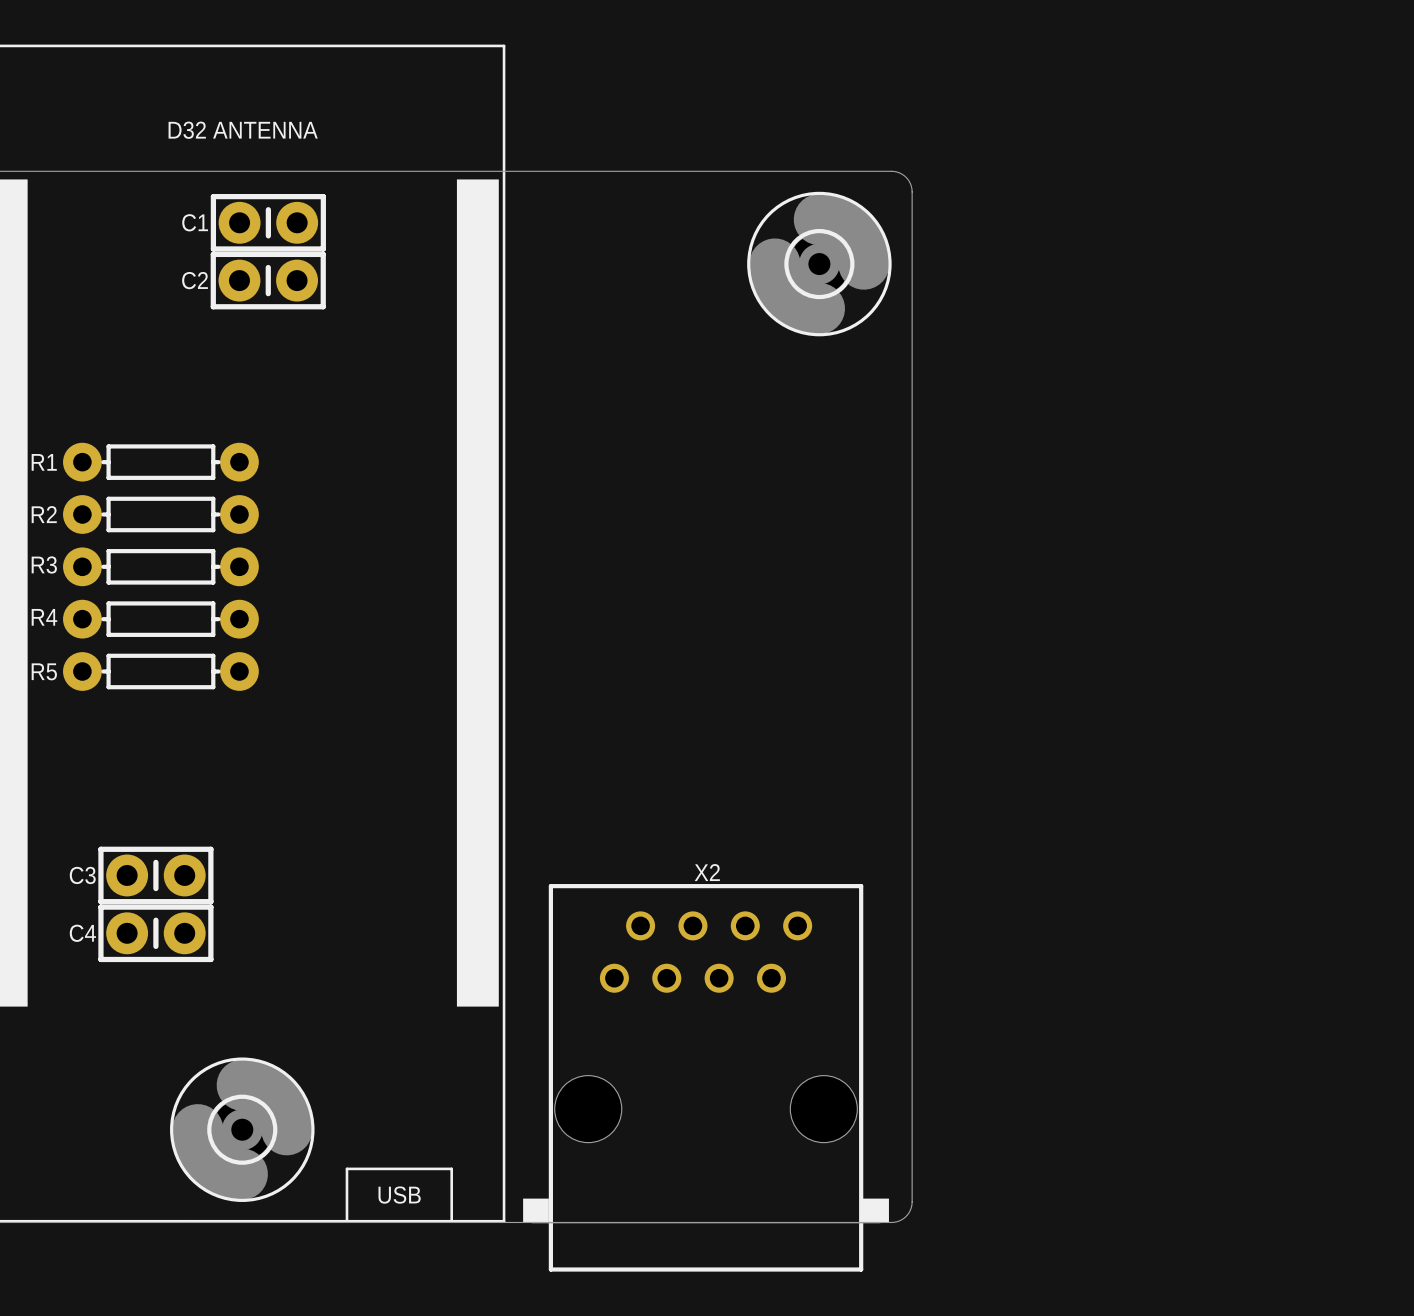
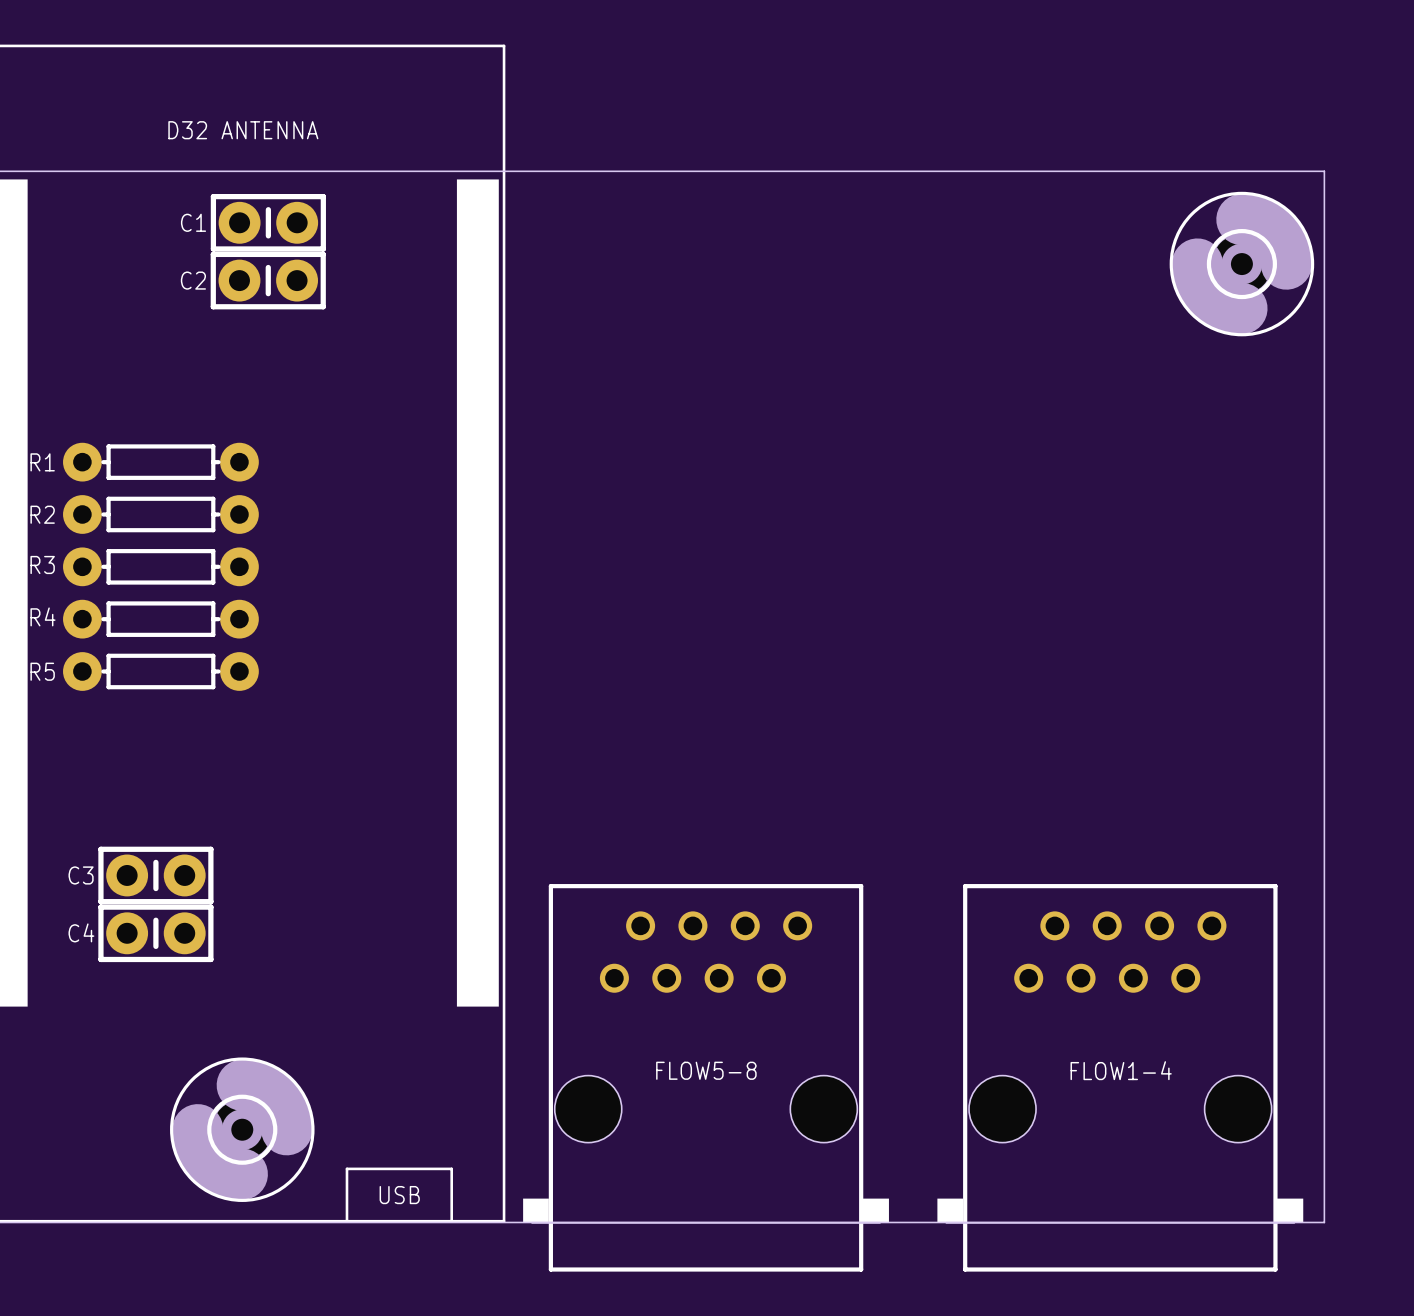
board edge: (891, 171) (899, 172) (906, 177) (910, 184) (912, 191) (912, 1201) (910, 1209) (906, 1216) (899, 1220) (891, 1222) -> (891, 171) (1324, 171) (1324, 1222) (891, 1222)
part position: (819, 264) -> (1241, 264)
X2 name: X2 (707, 872) -> FLOW5-8 (706, 1070)
FLOW1-4: none -> (1120, 1077)

